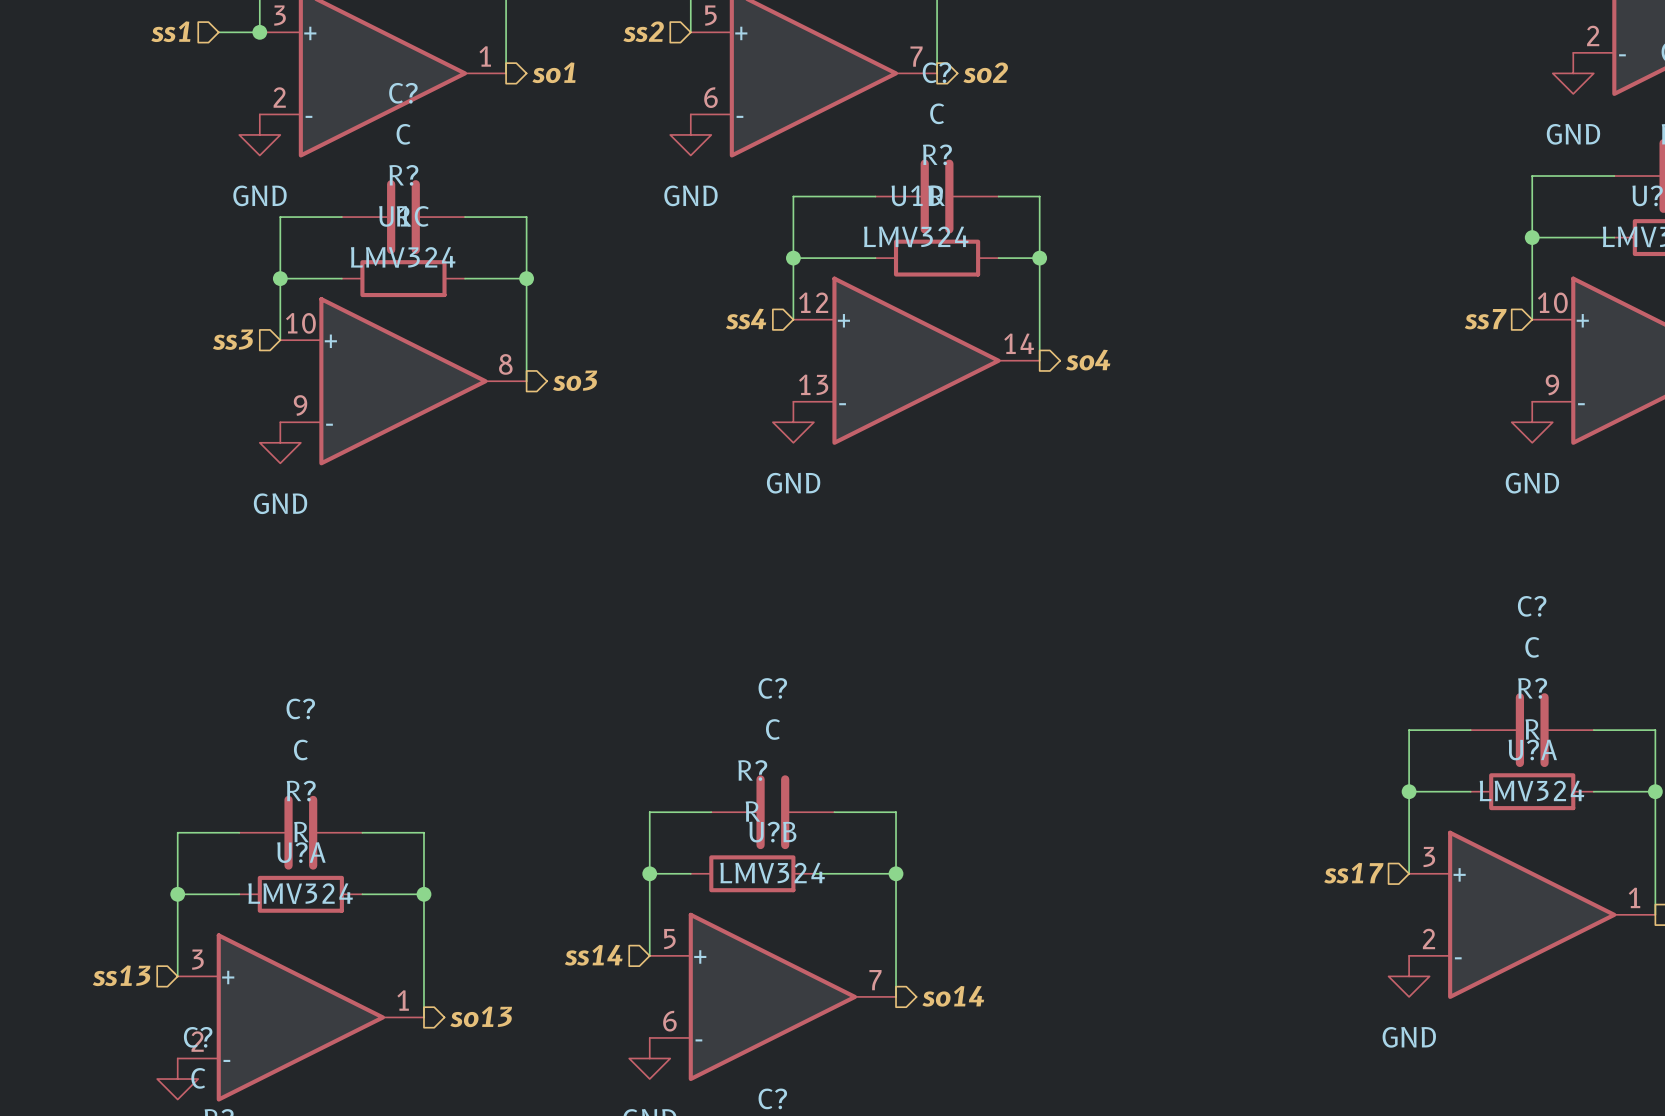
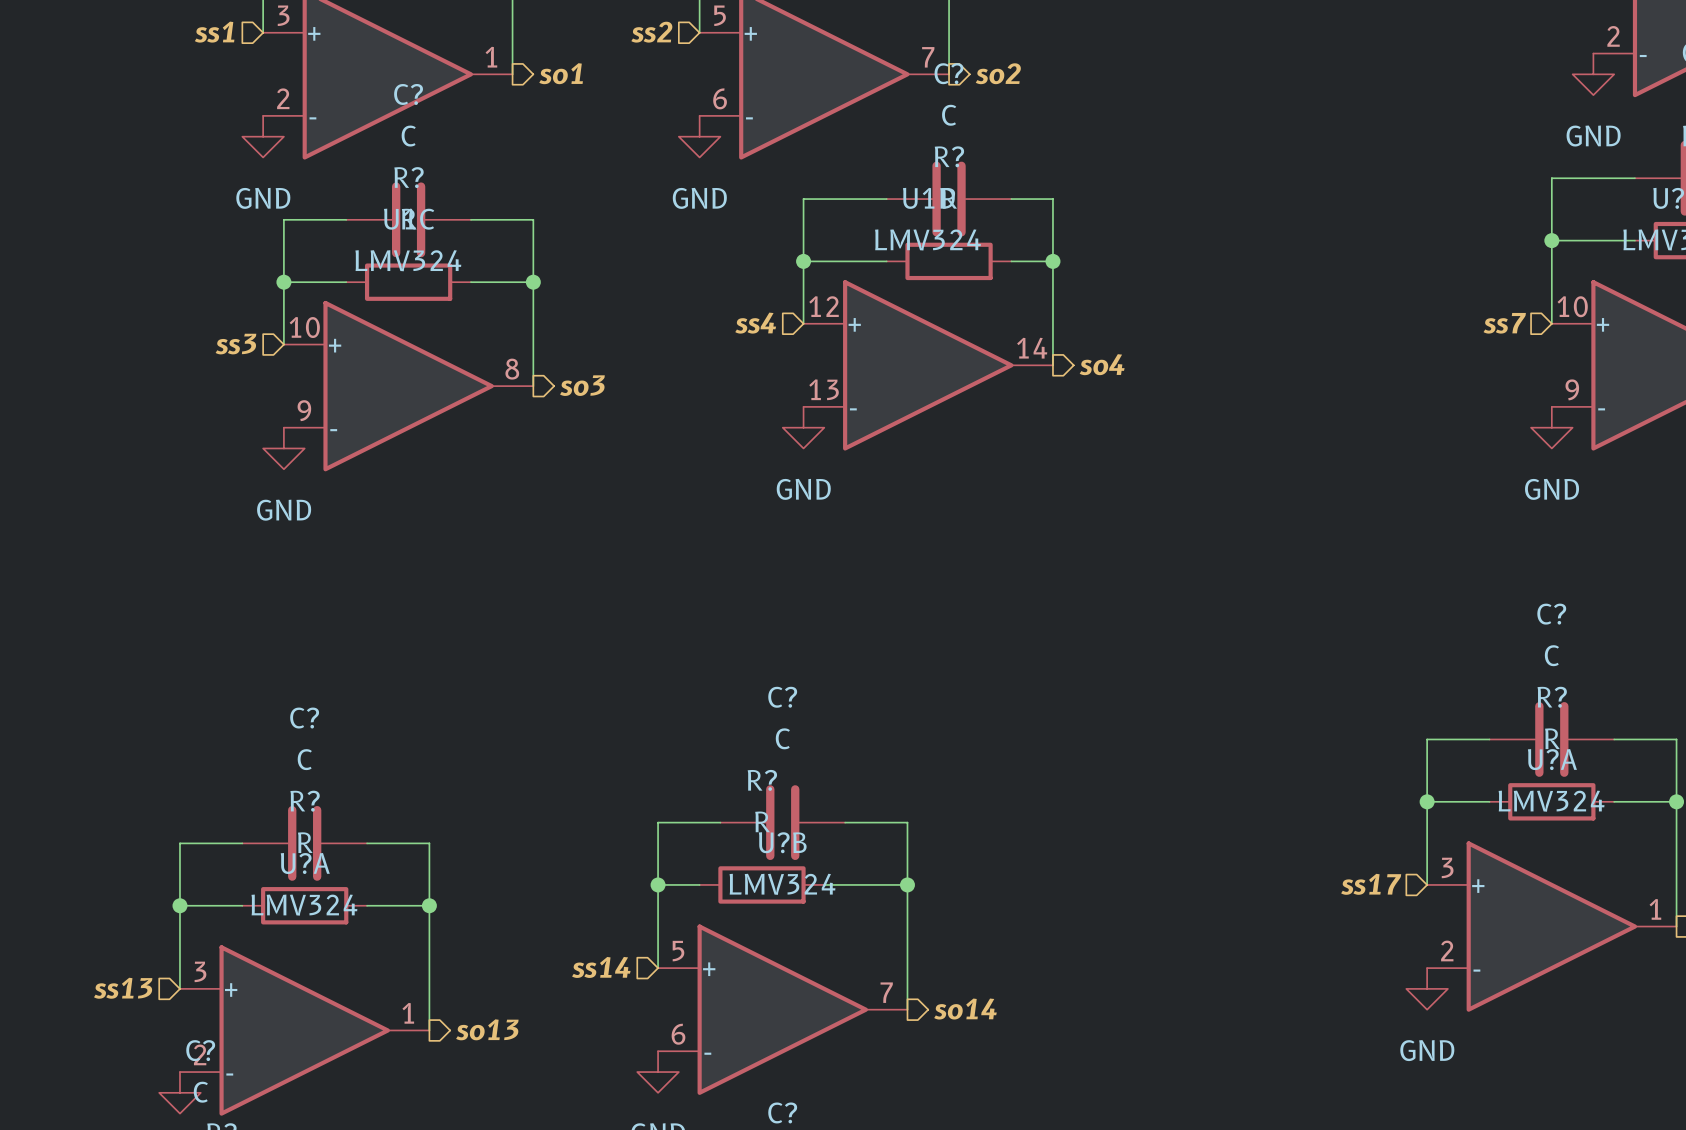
hierarchical label position: ss1 (170, 31) -> ss1 (214, 32)
wire: (218, 32) (259, 32) -> none
junction: (259, 32) -> none

